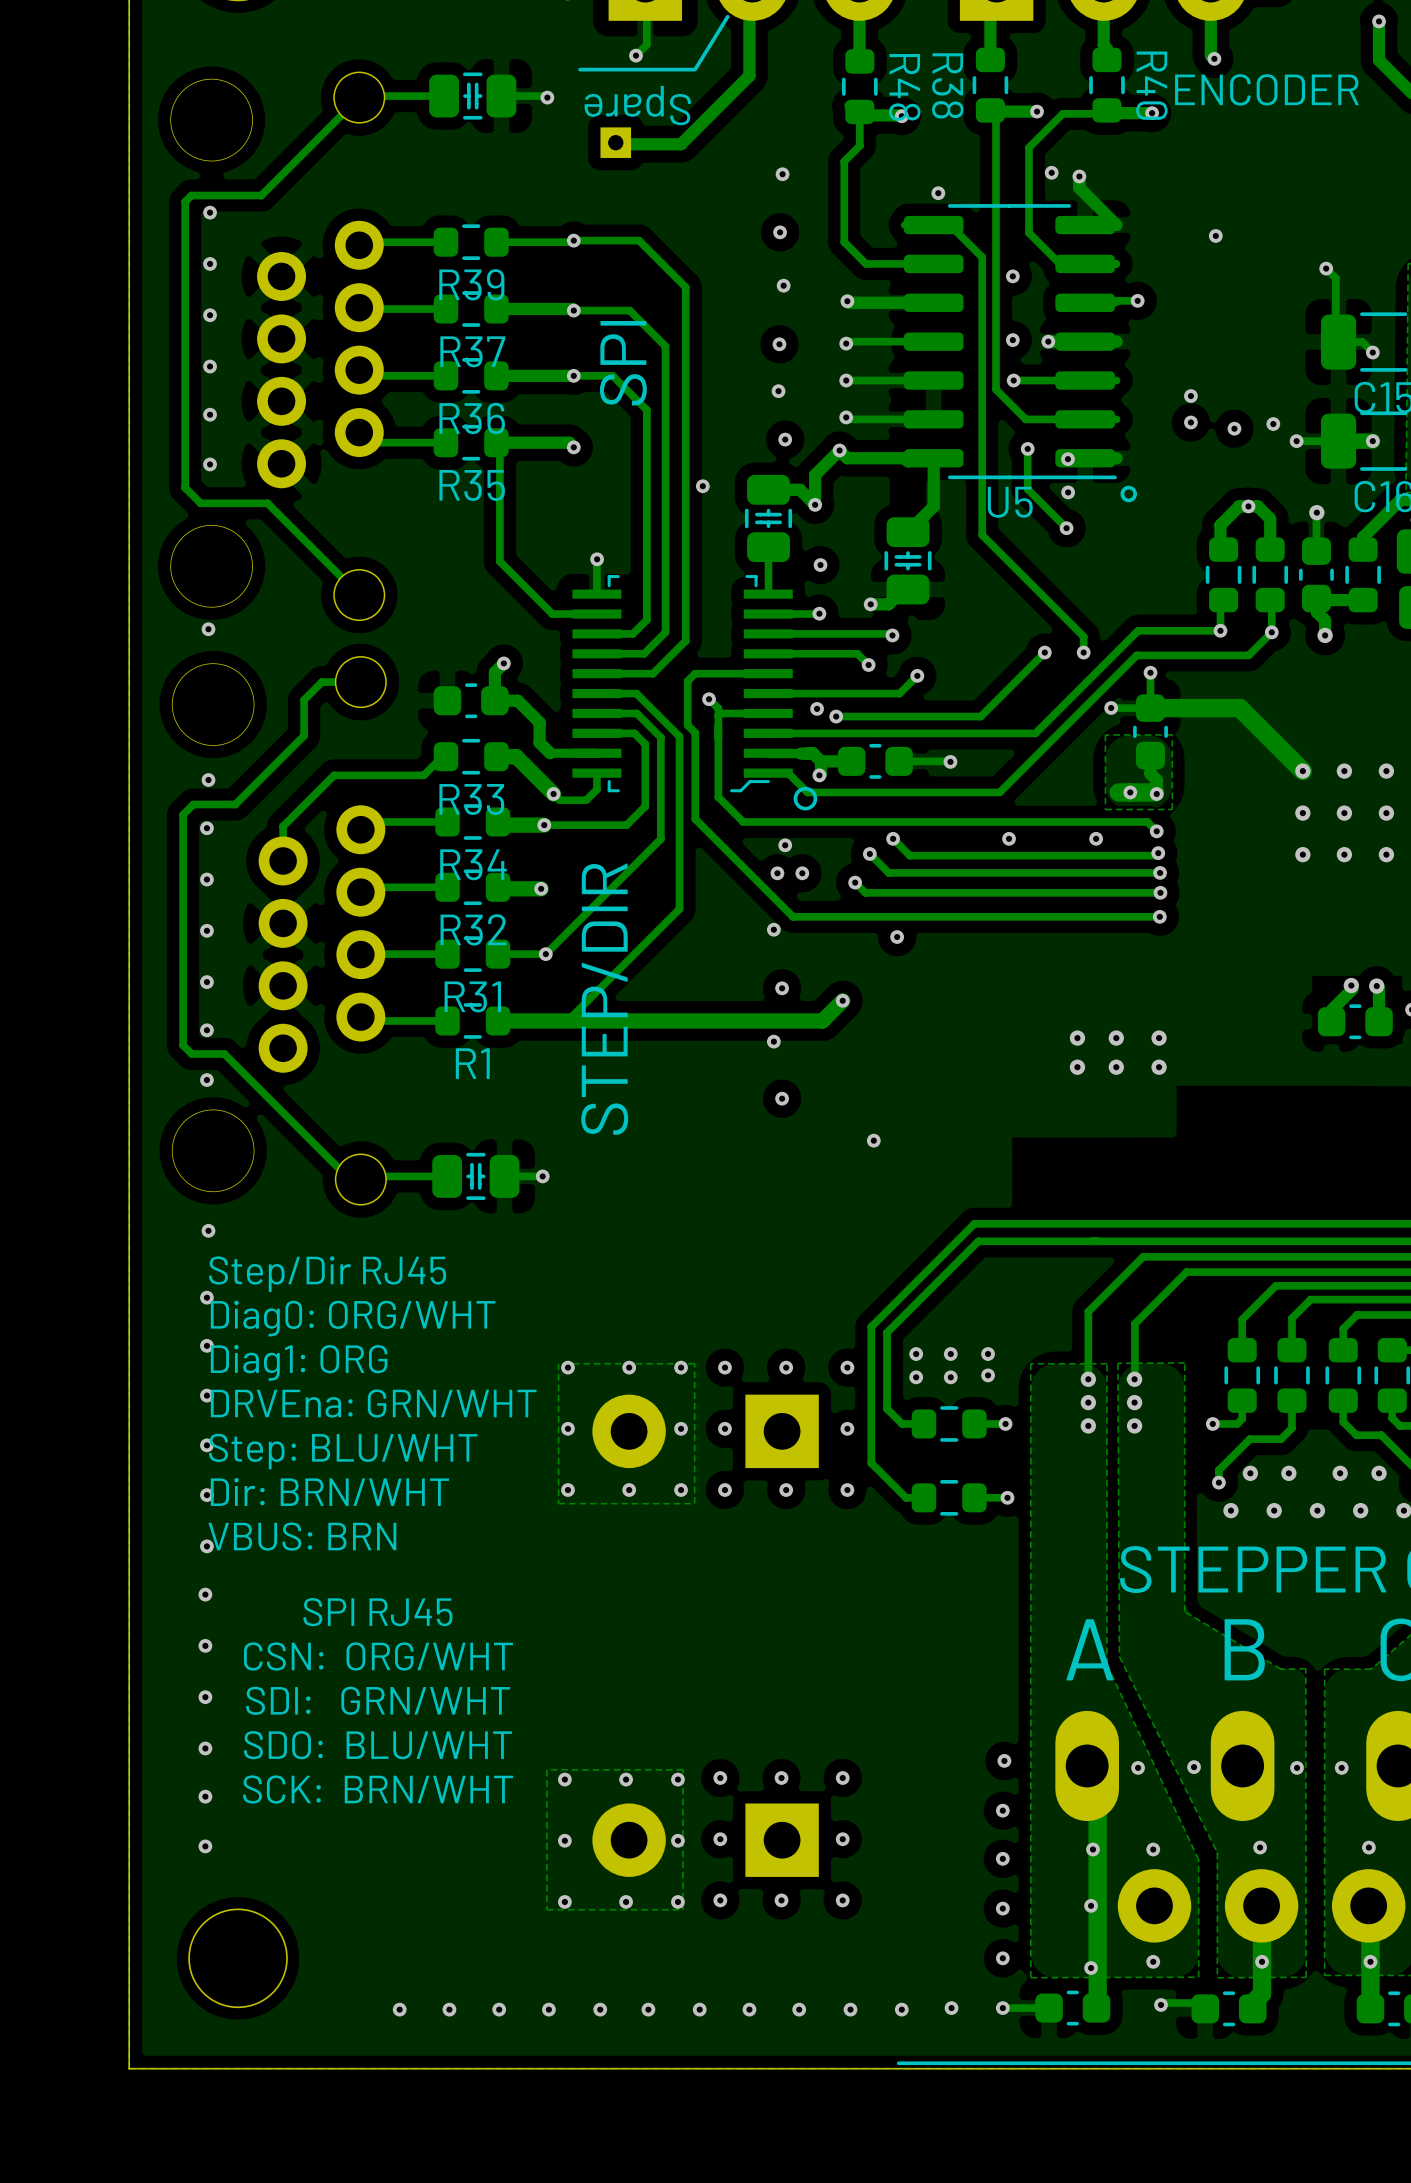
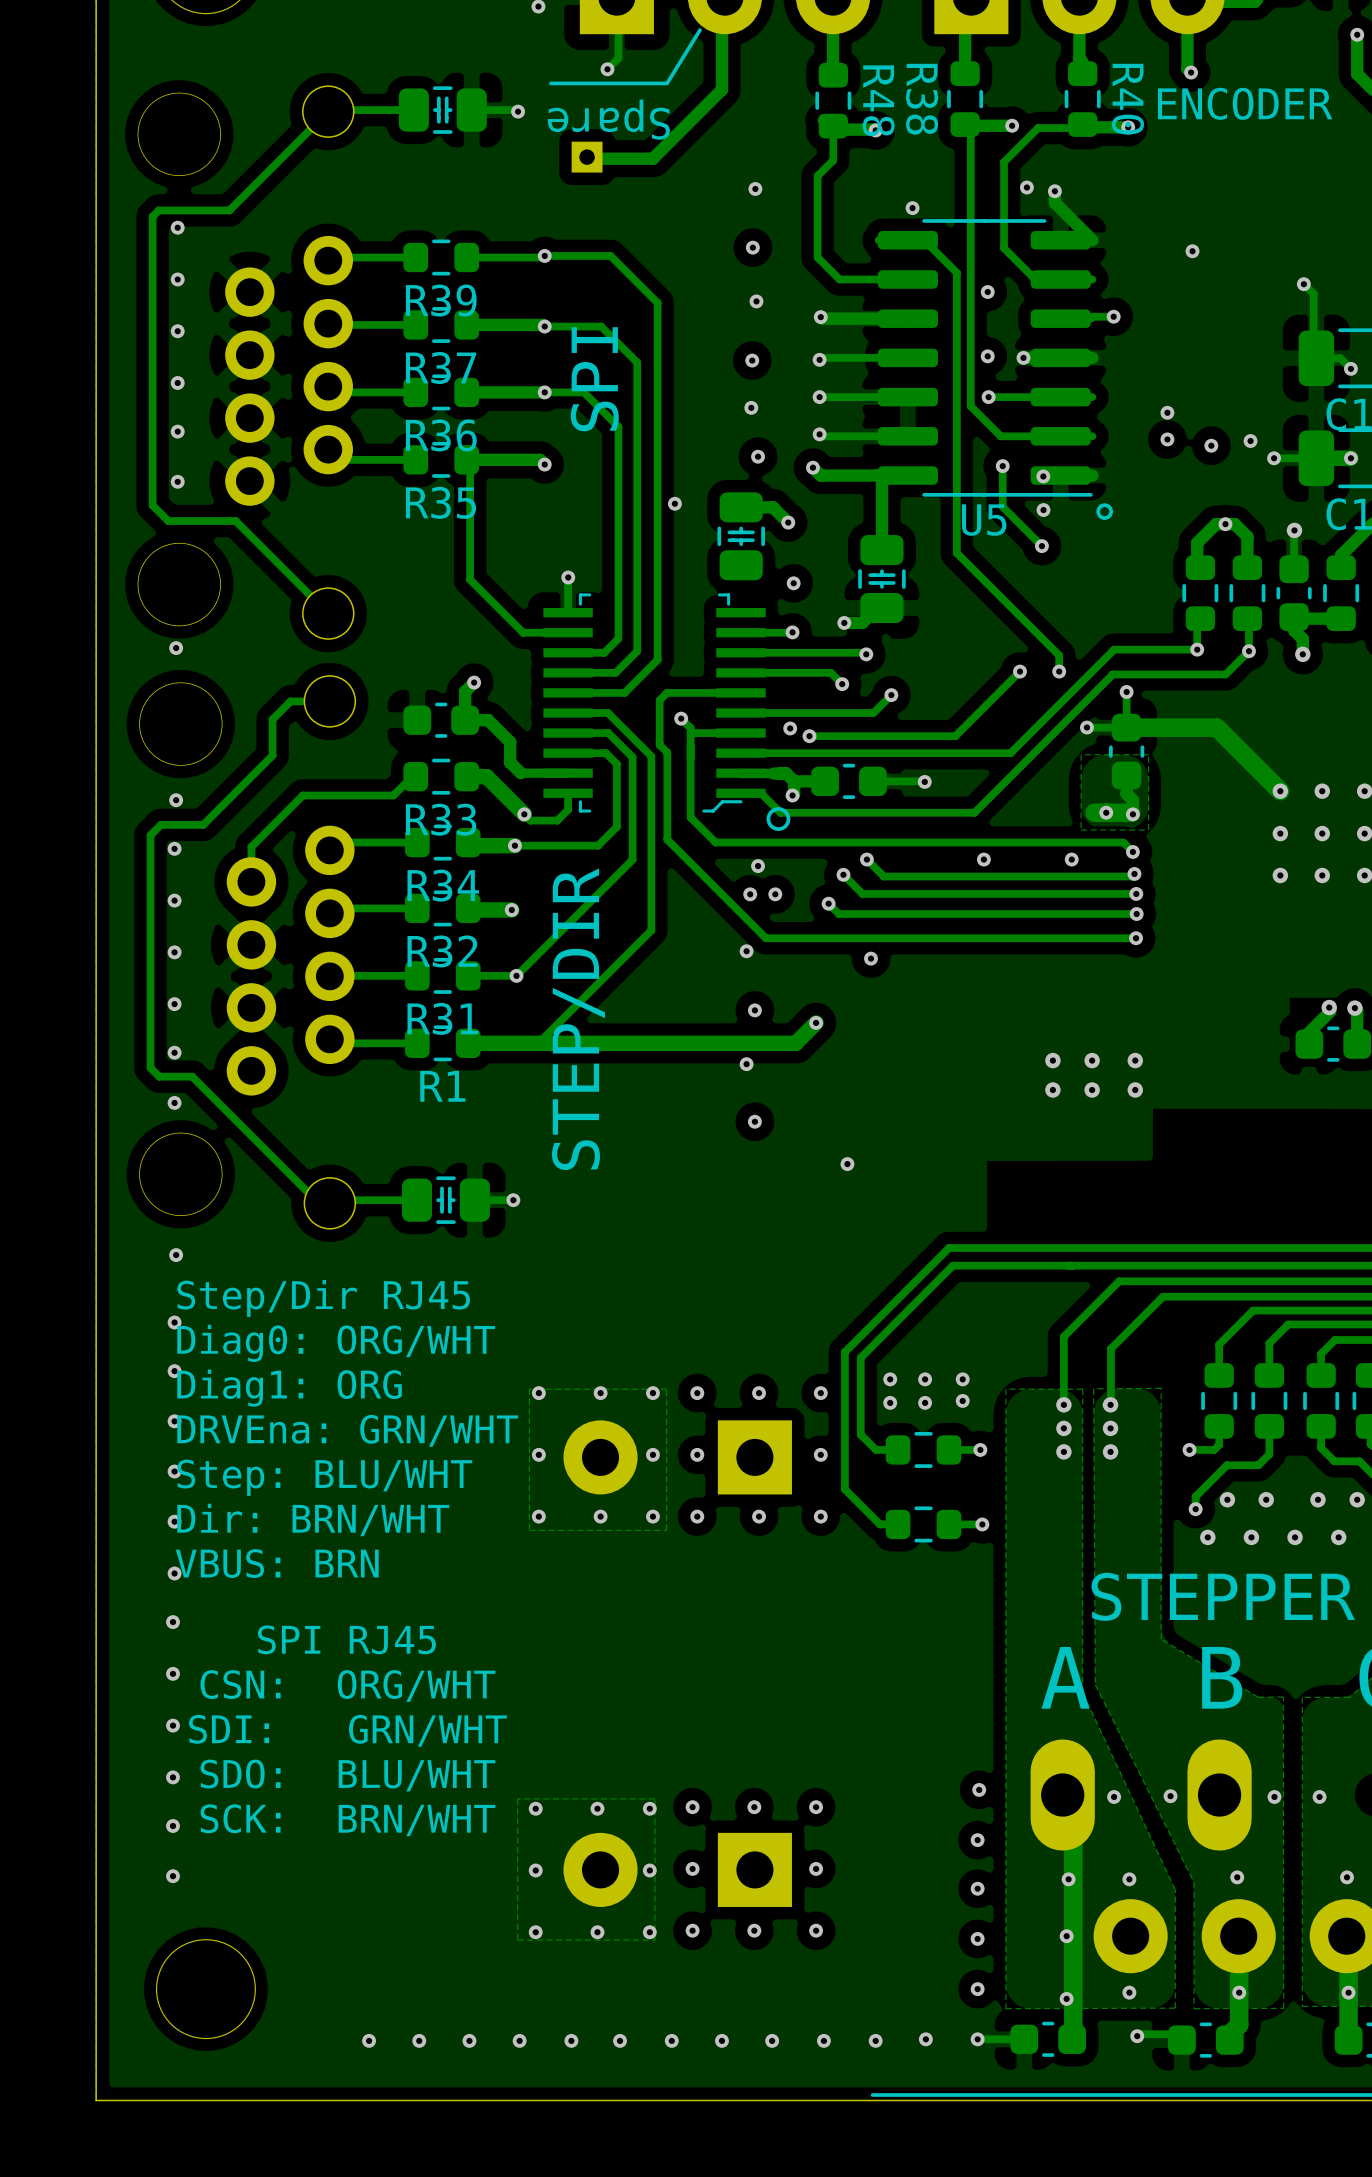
track: (839, 450) (815, 474) (815, 504) -> none
track: (933, 458) (933, 506) (908, 532) -> none
track: none -> (881, 478) (881, 545)
track: (768, 547) (768, 593) -> none

